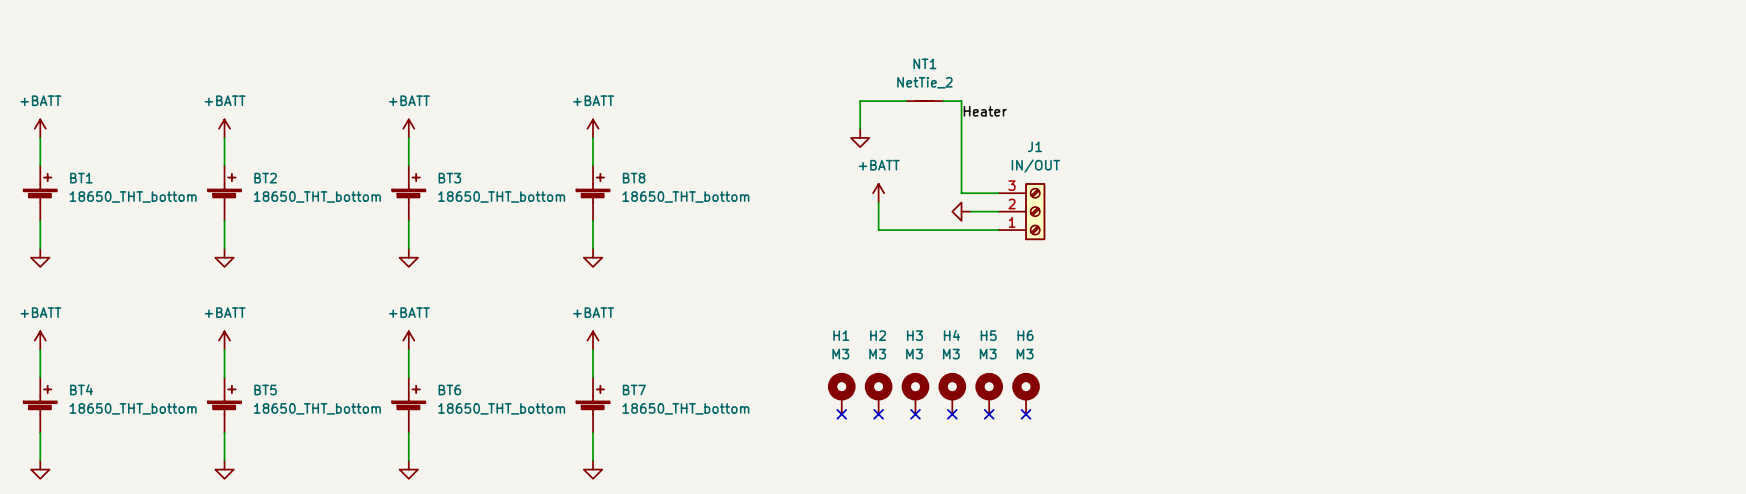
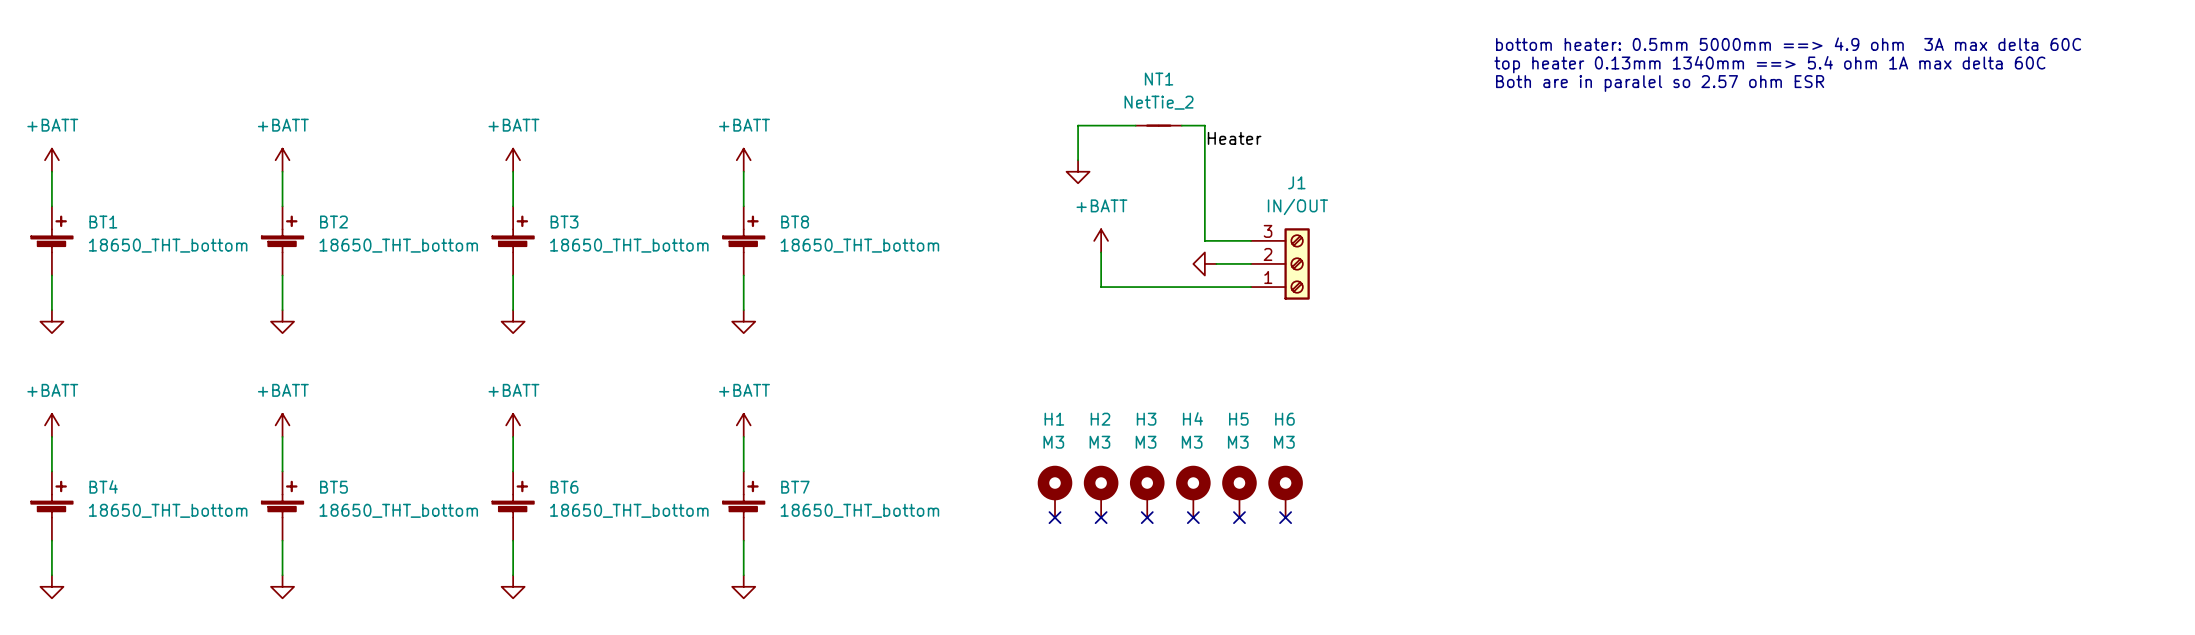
text: none -> bottom heater: 0.5mm 5000mm ==> 4.9 ohm 3A max delta 60C (1788, 44)
text: none -> top heater 0.13mm 1340mm ==> 5.4 ohm 1A max delta 60C (1769, 64)
text: none -> Both are in paralel so 2.57 ohm ESR (1660, 83)

